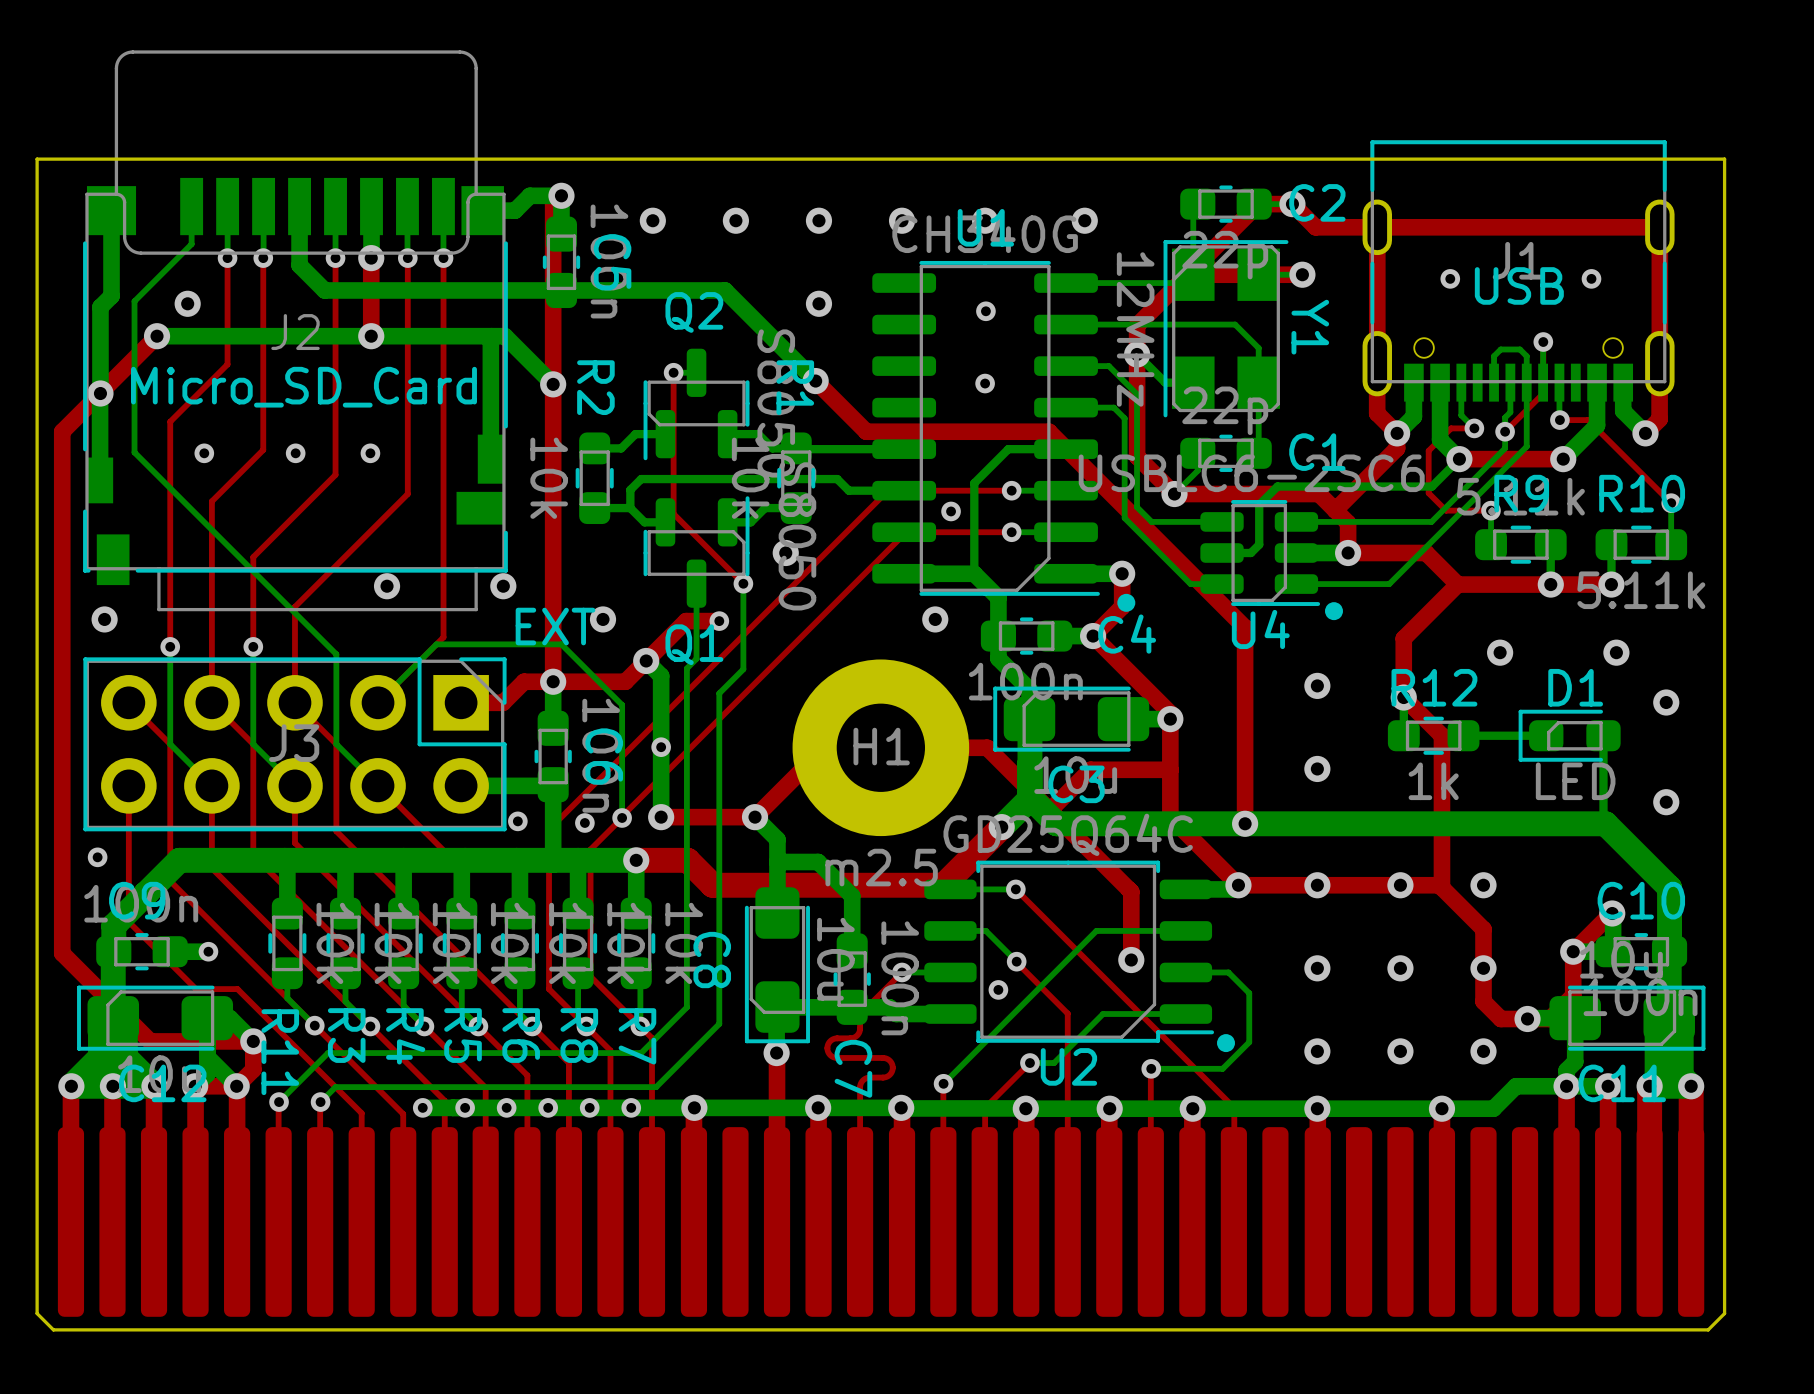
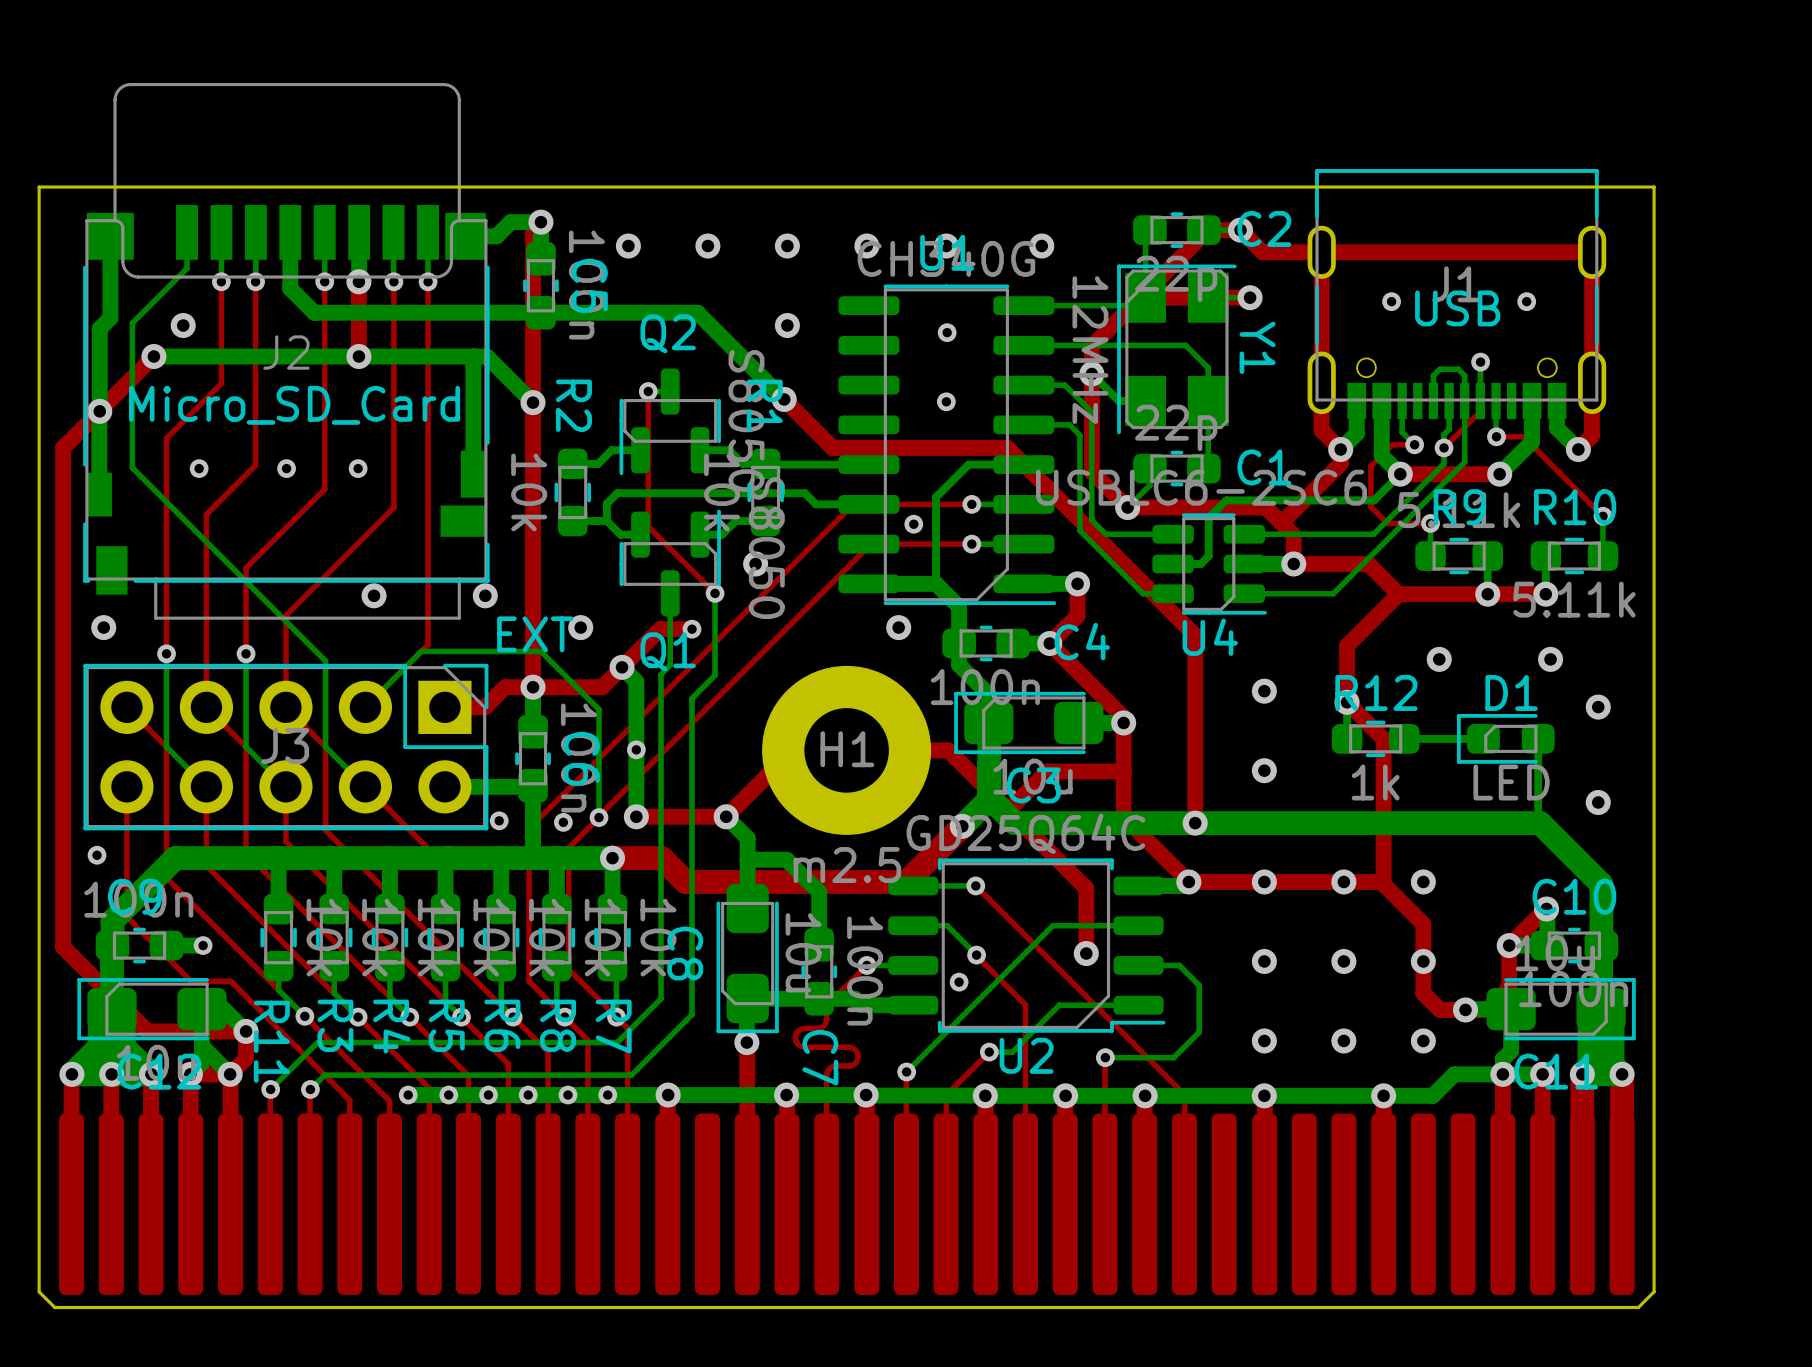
drawing: [1117, 593, 1136, 612] -> none
drawing: [1324, 602, 1343, 621] -> none
drawing: [1217, 1034, 1235, 1053] -> none

